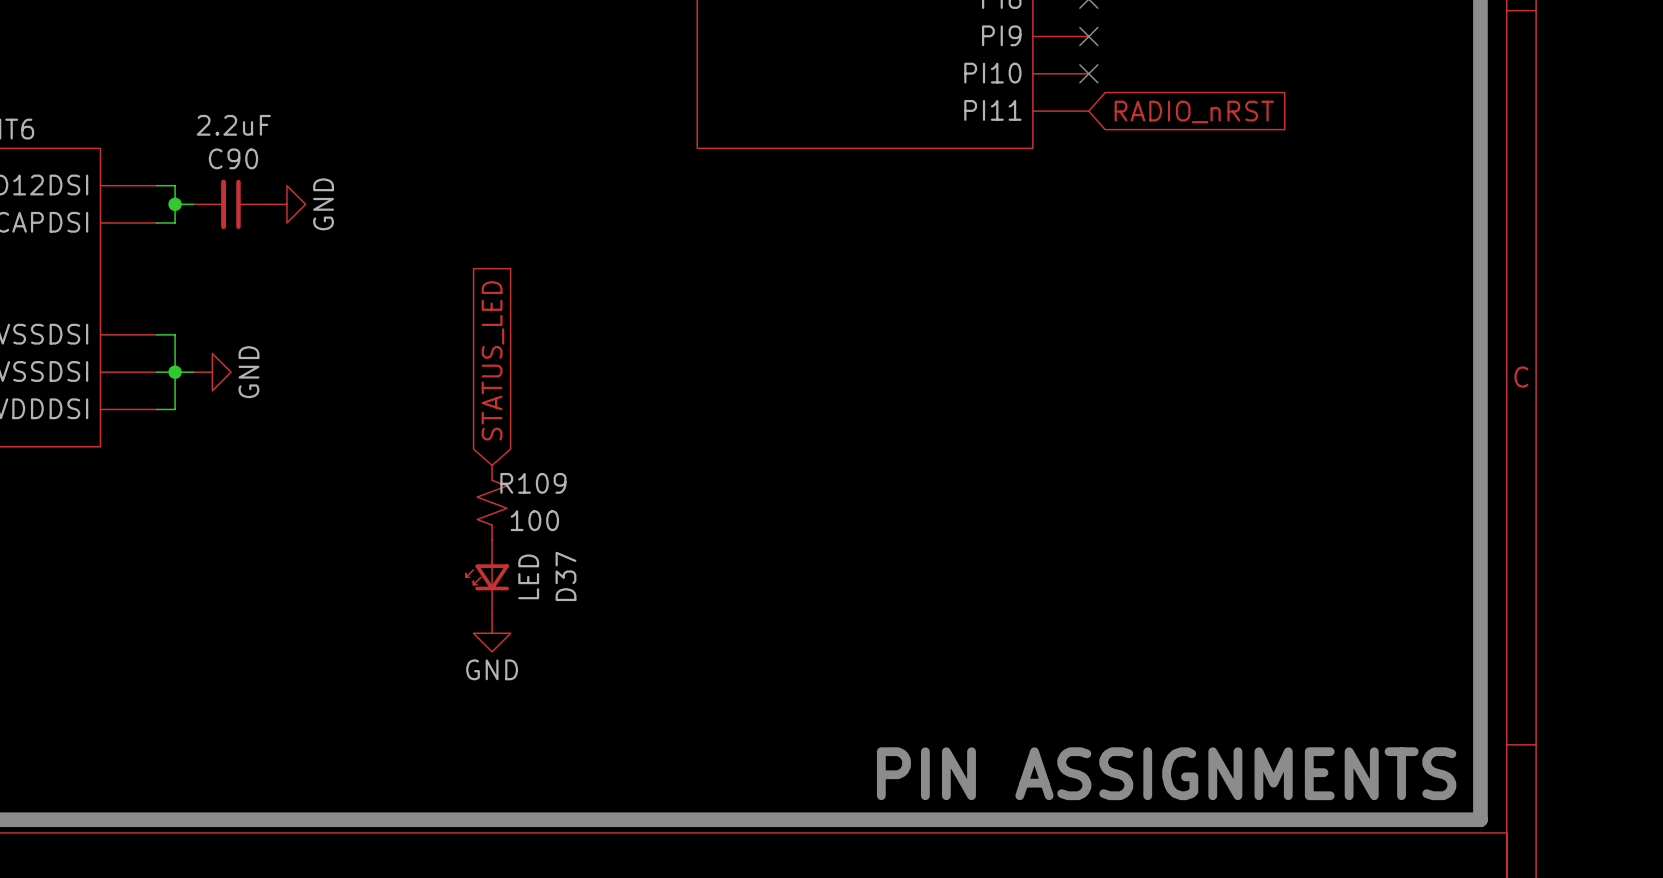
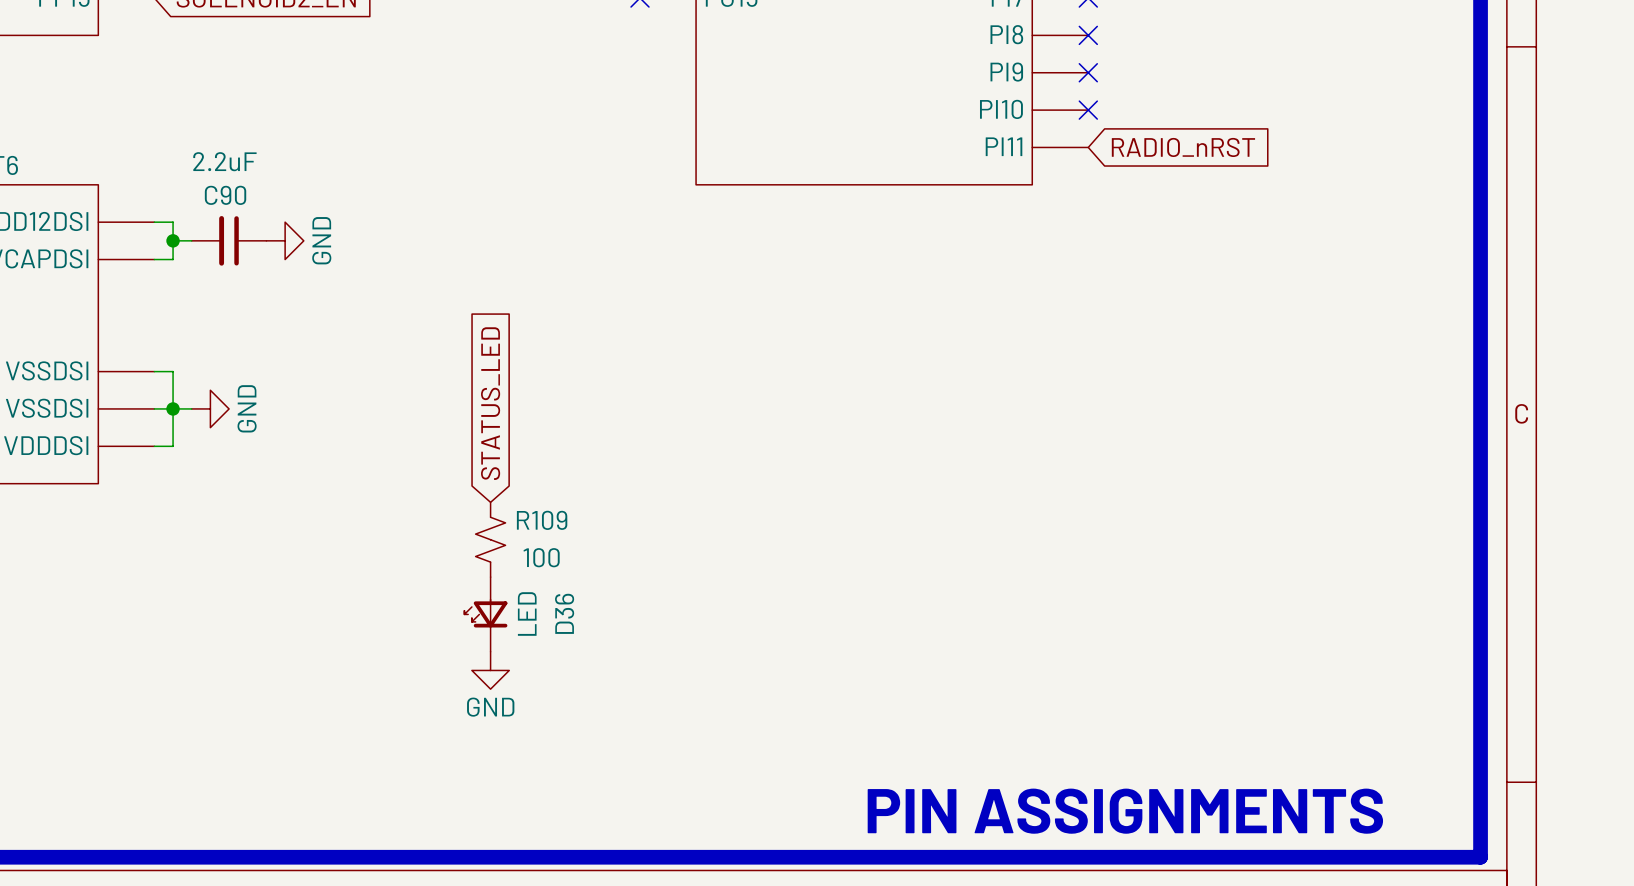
D37 name: D37 (565, 576) -> D36 (564, 613)

